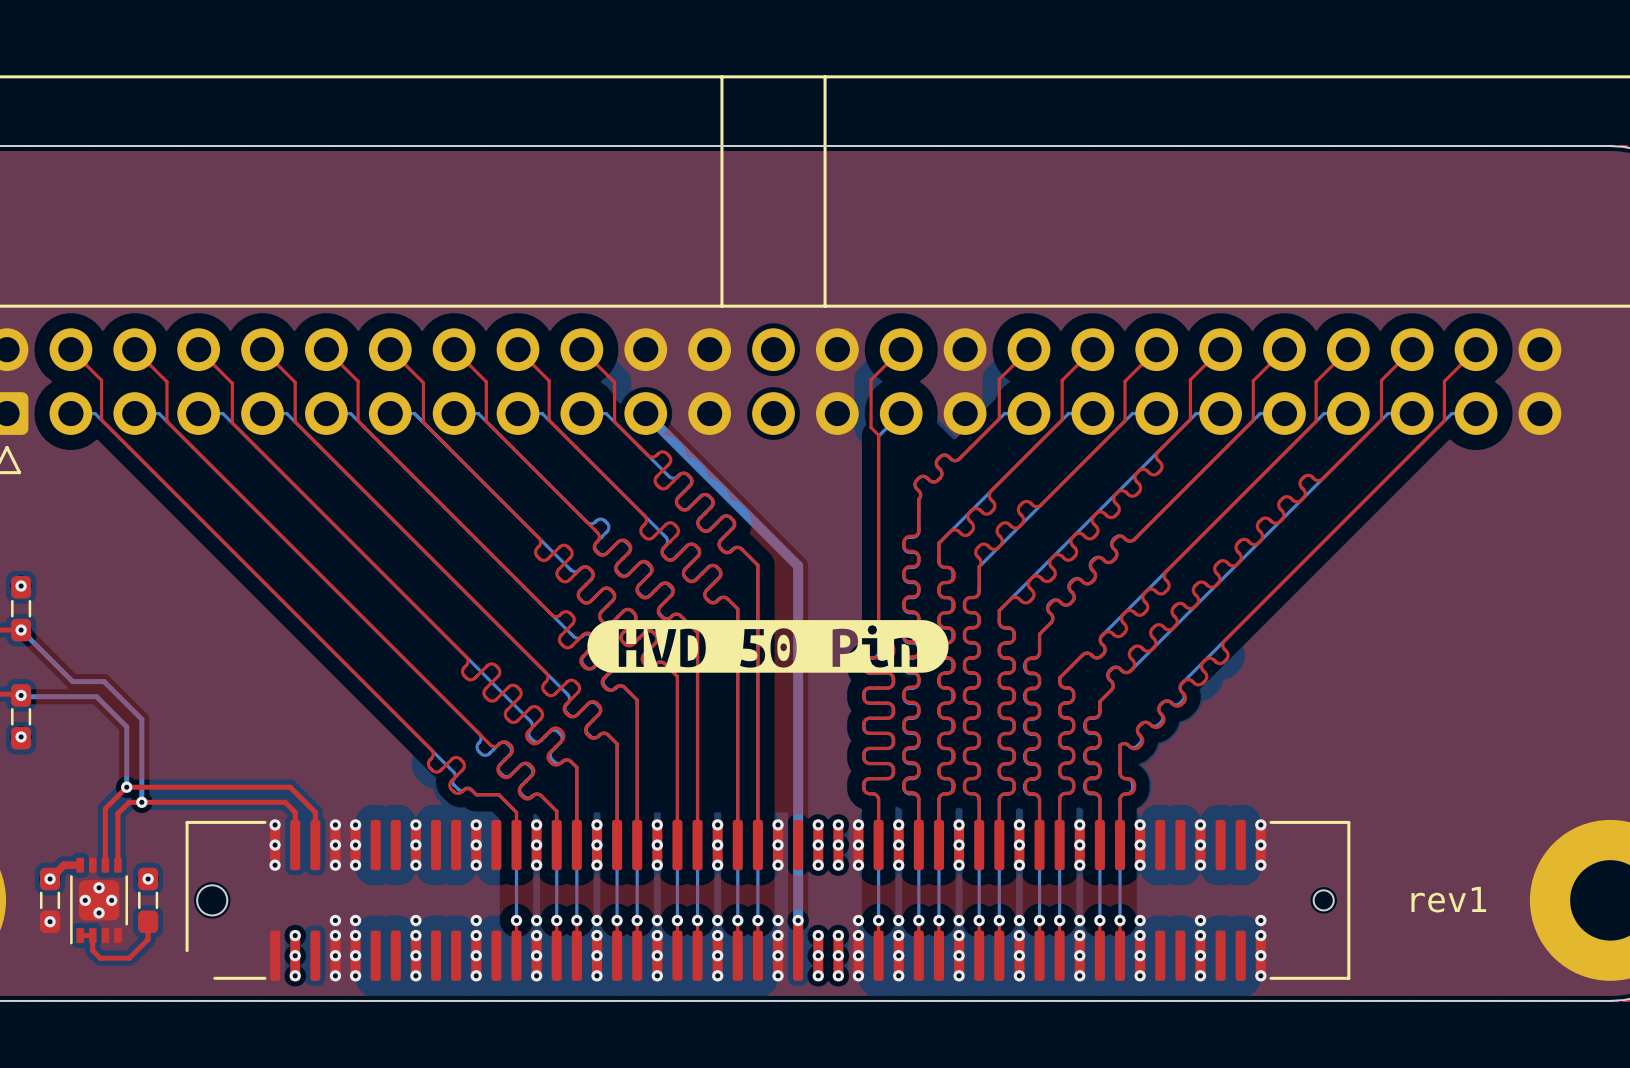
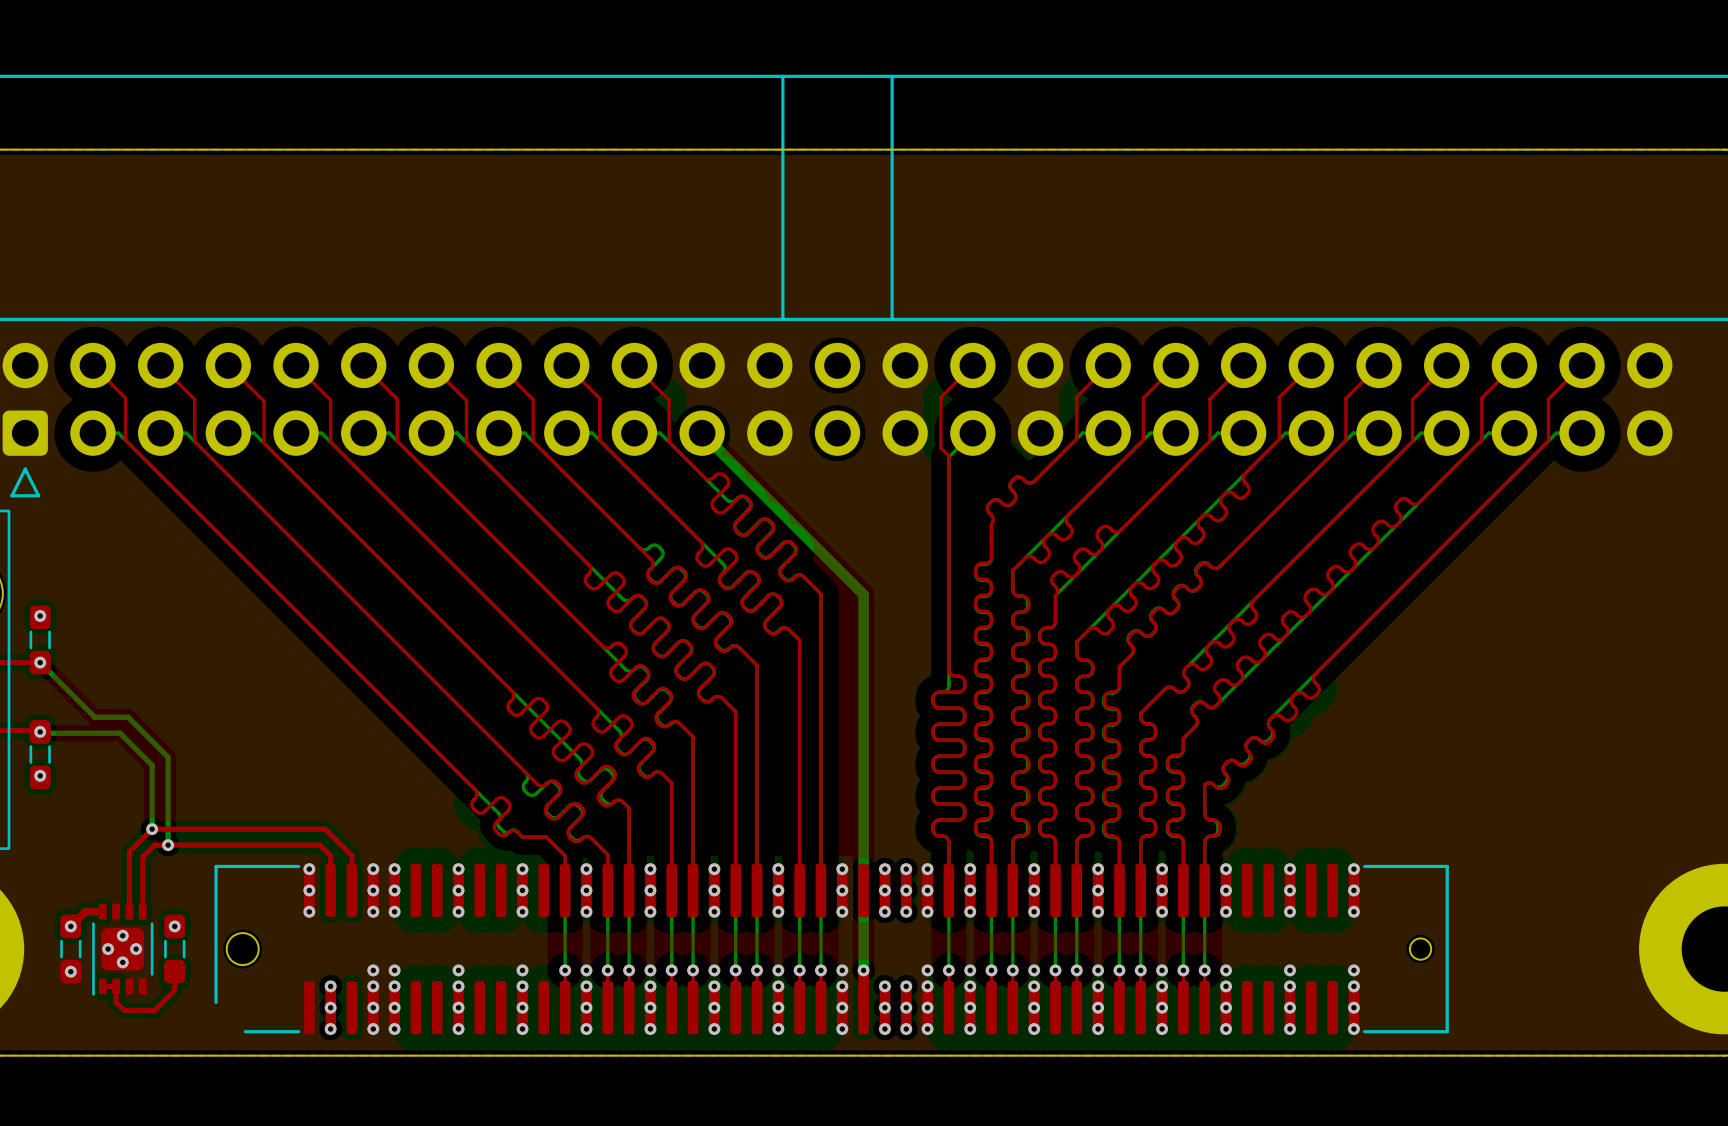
drawing: [587, 620, 949, 673] -> none
text: rev1 (1448, 899) -> none

